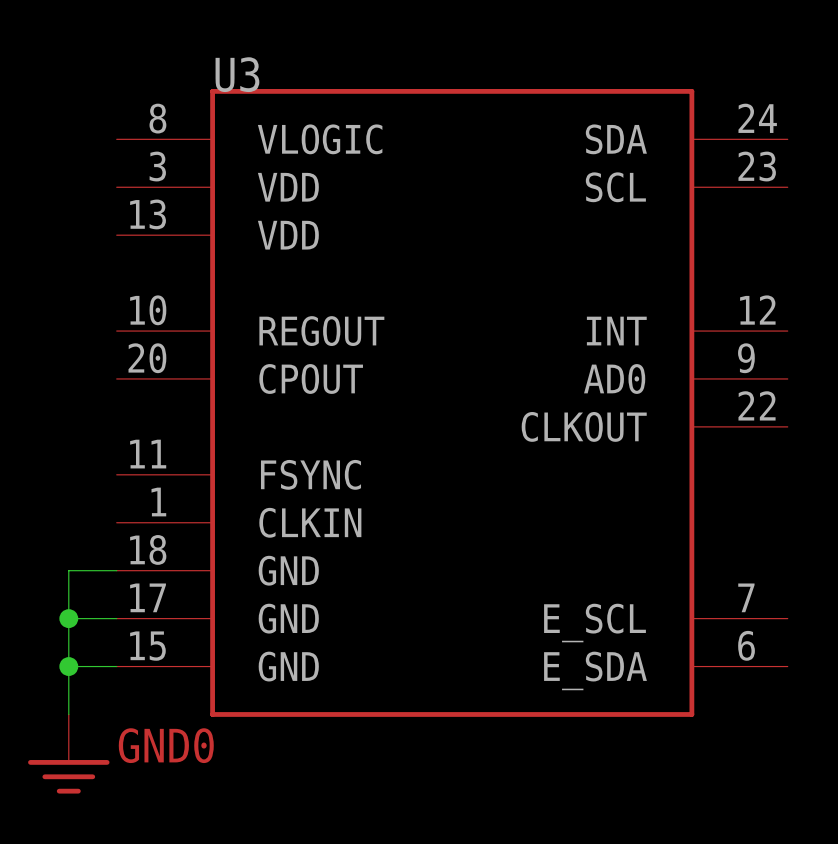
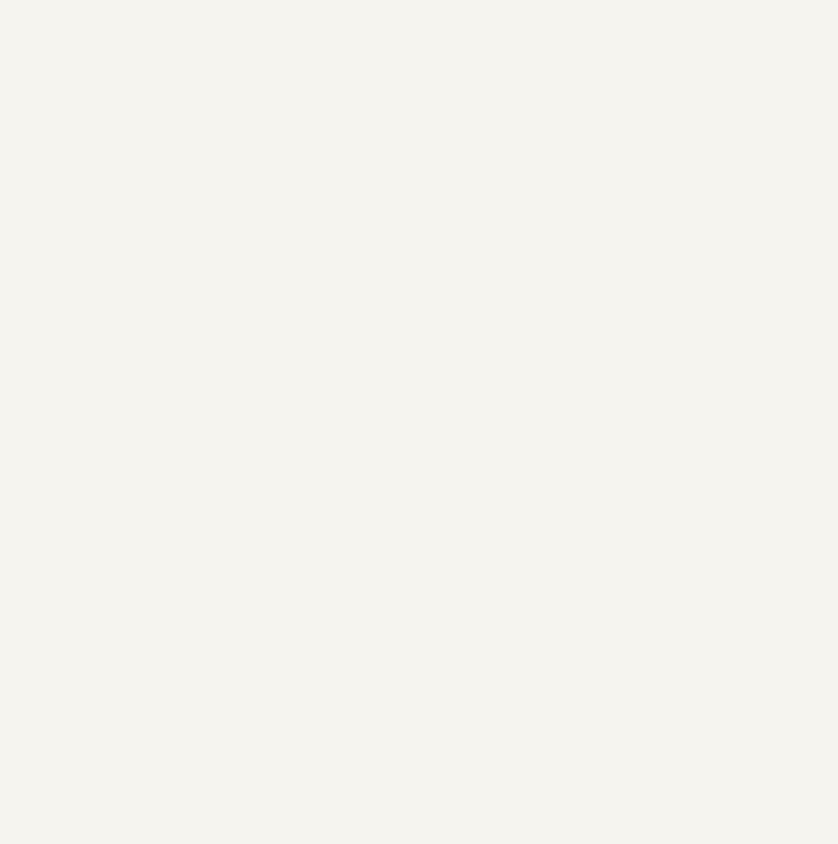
U3: (452, 402) -> none
wire: (116, 570) (68, 570) (68, 714) -> none
wire: (68, 618) (116, 618) -> none
junction: (68, 618) -> none
wire: (68, 666) (116, 666) -> none
junction: (68, 666) -> none
GND0: (68, 754) -> none

